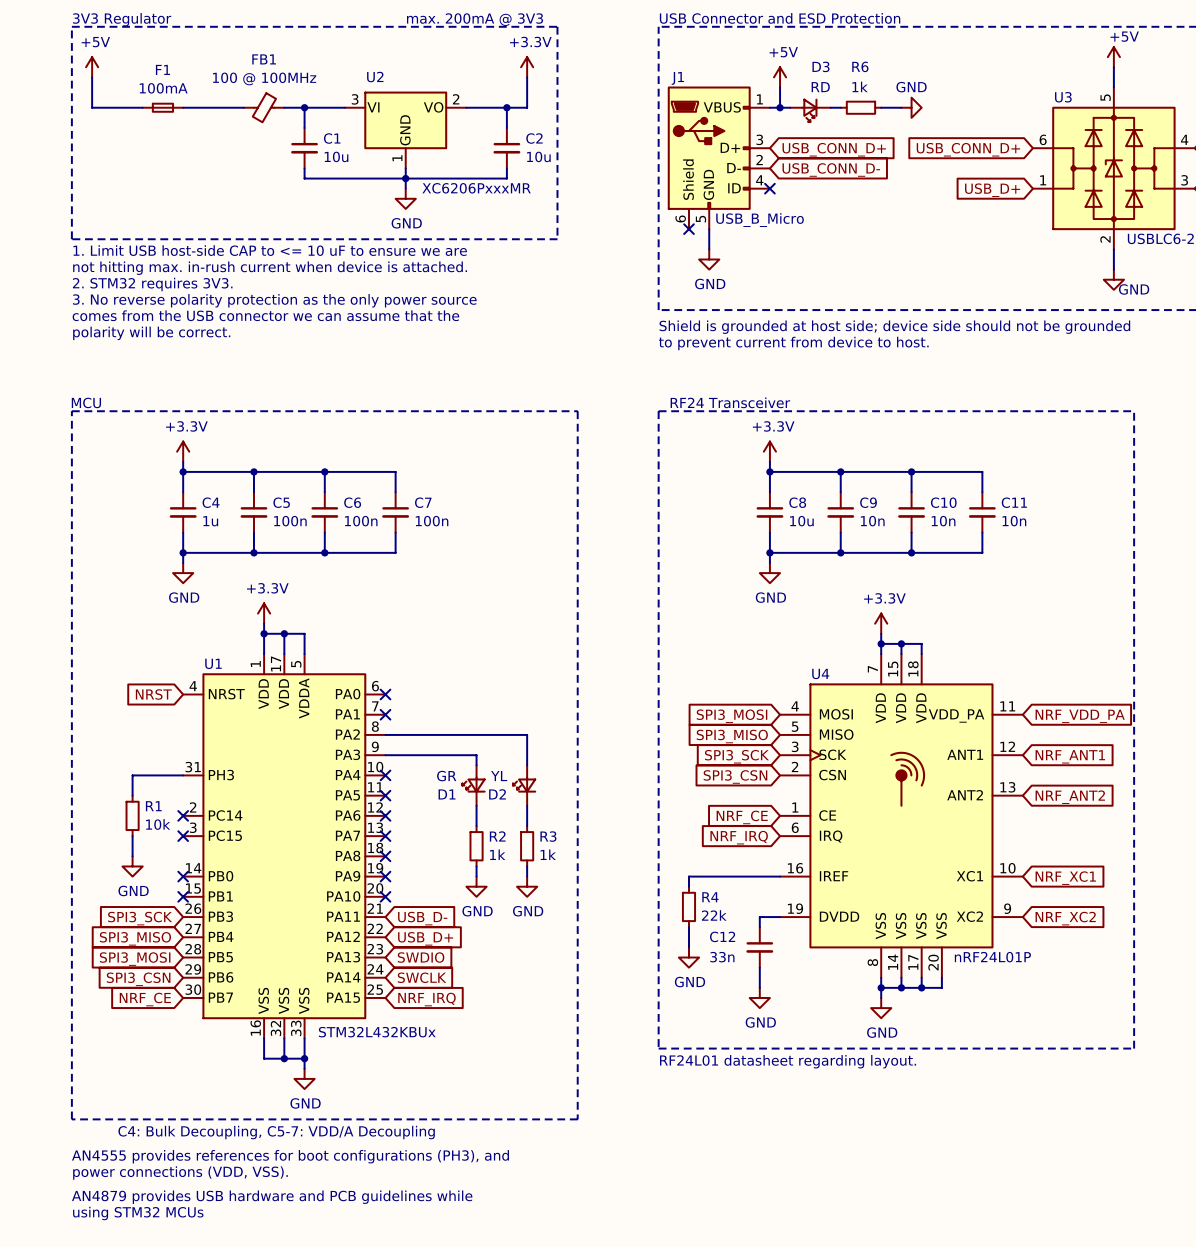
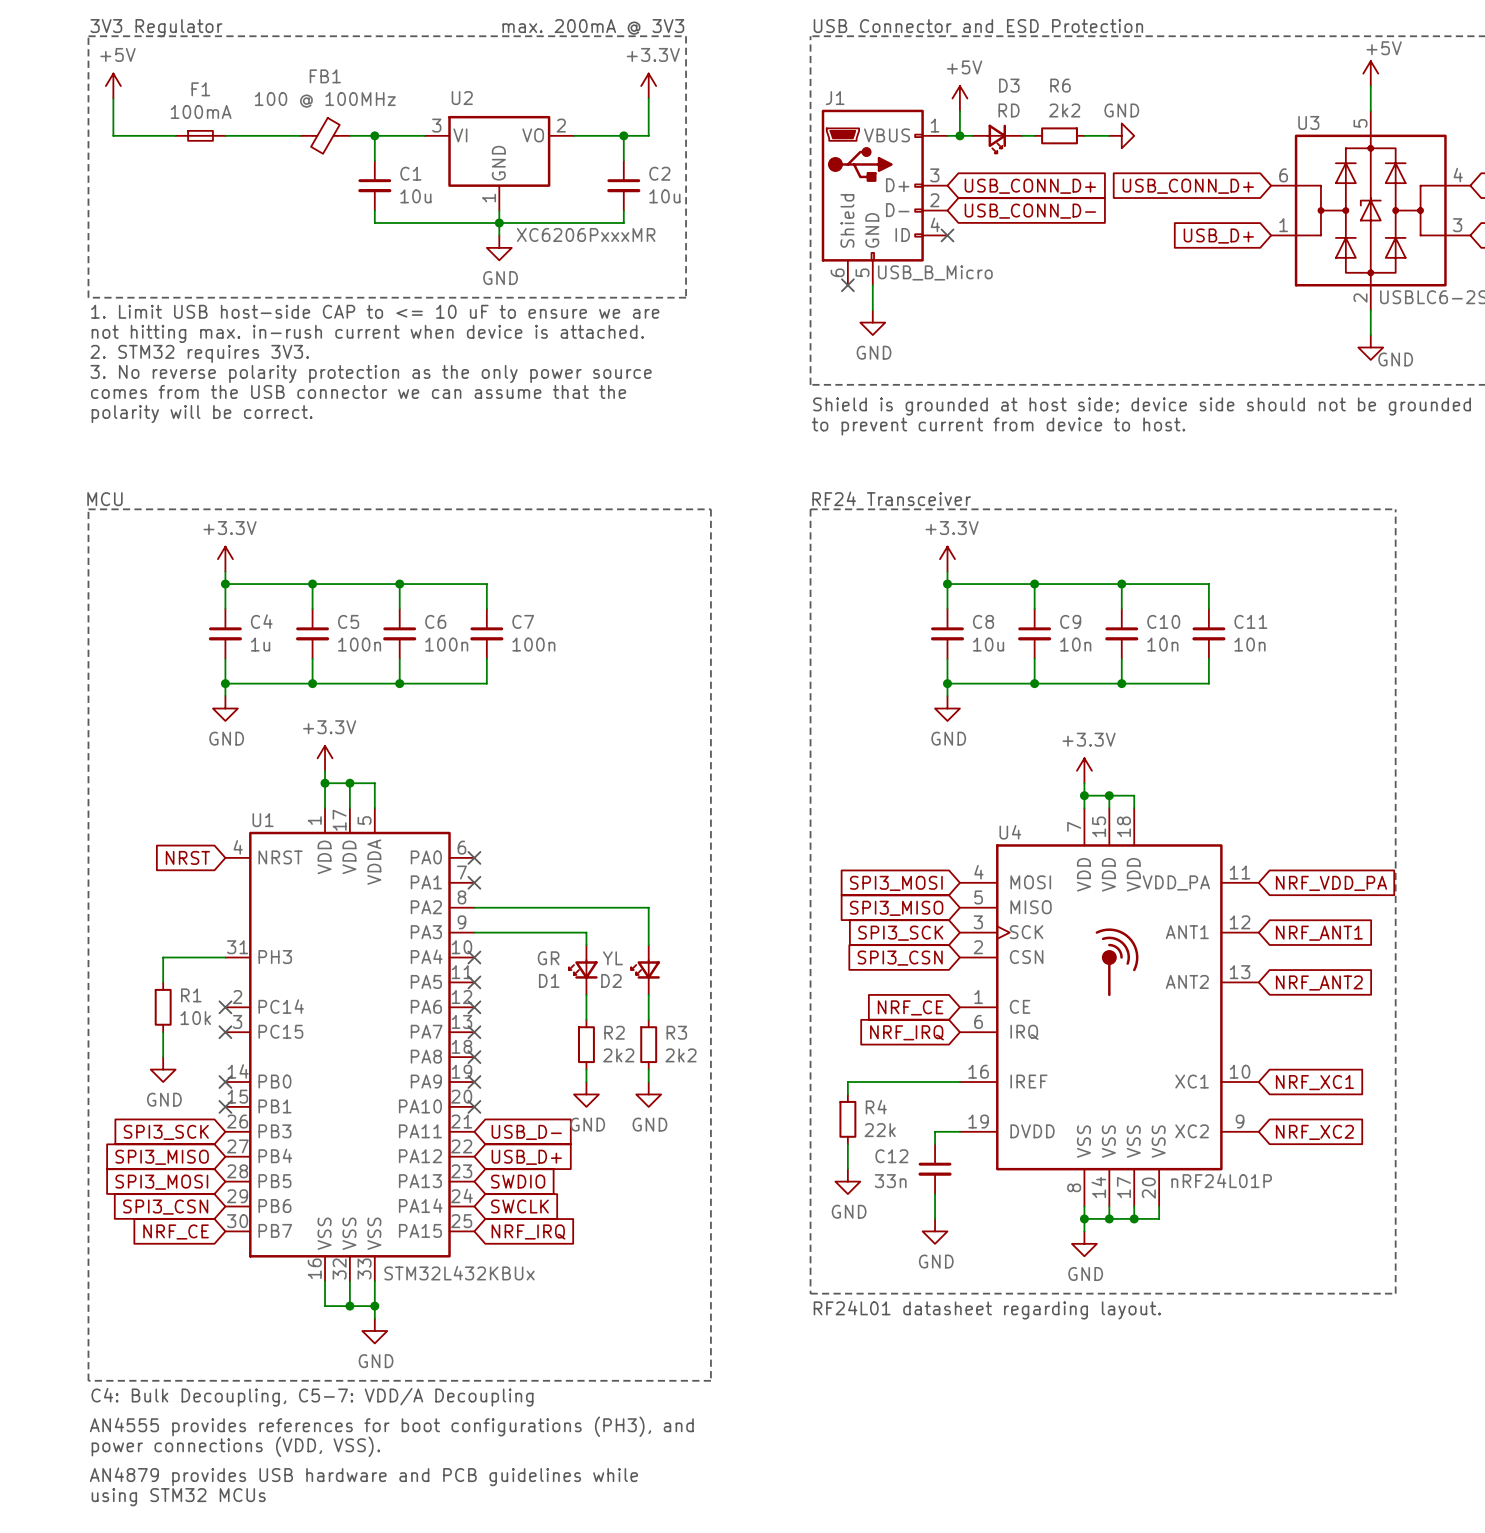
R6 value: 1k (860, 86) -> 2k2 (1064, 110)
R2 value: 1k (497, 854) -> 2k2 (618, 1055)
R3 value: 1k (548, 854) -> 2k2 (680, 1055)

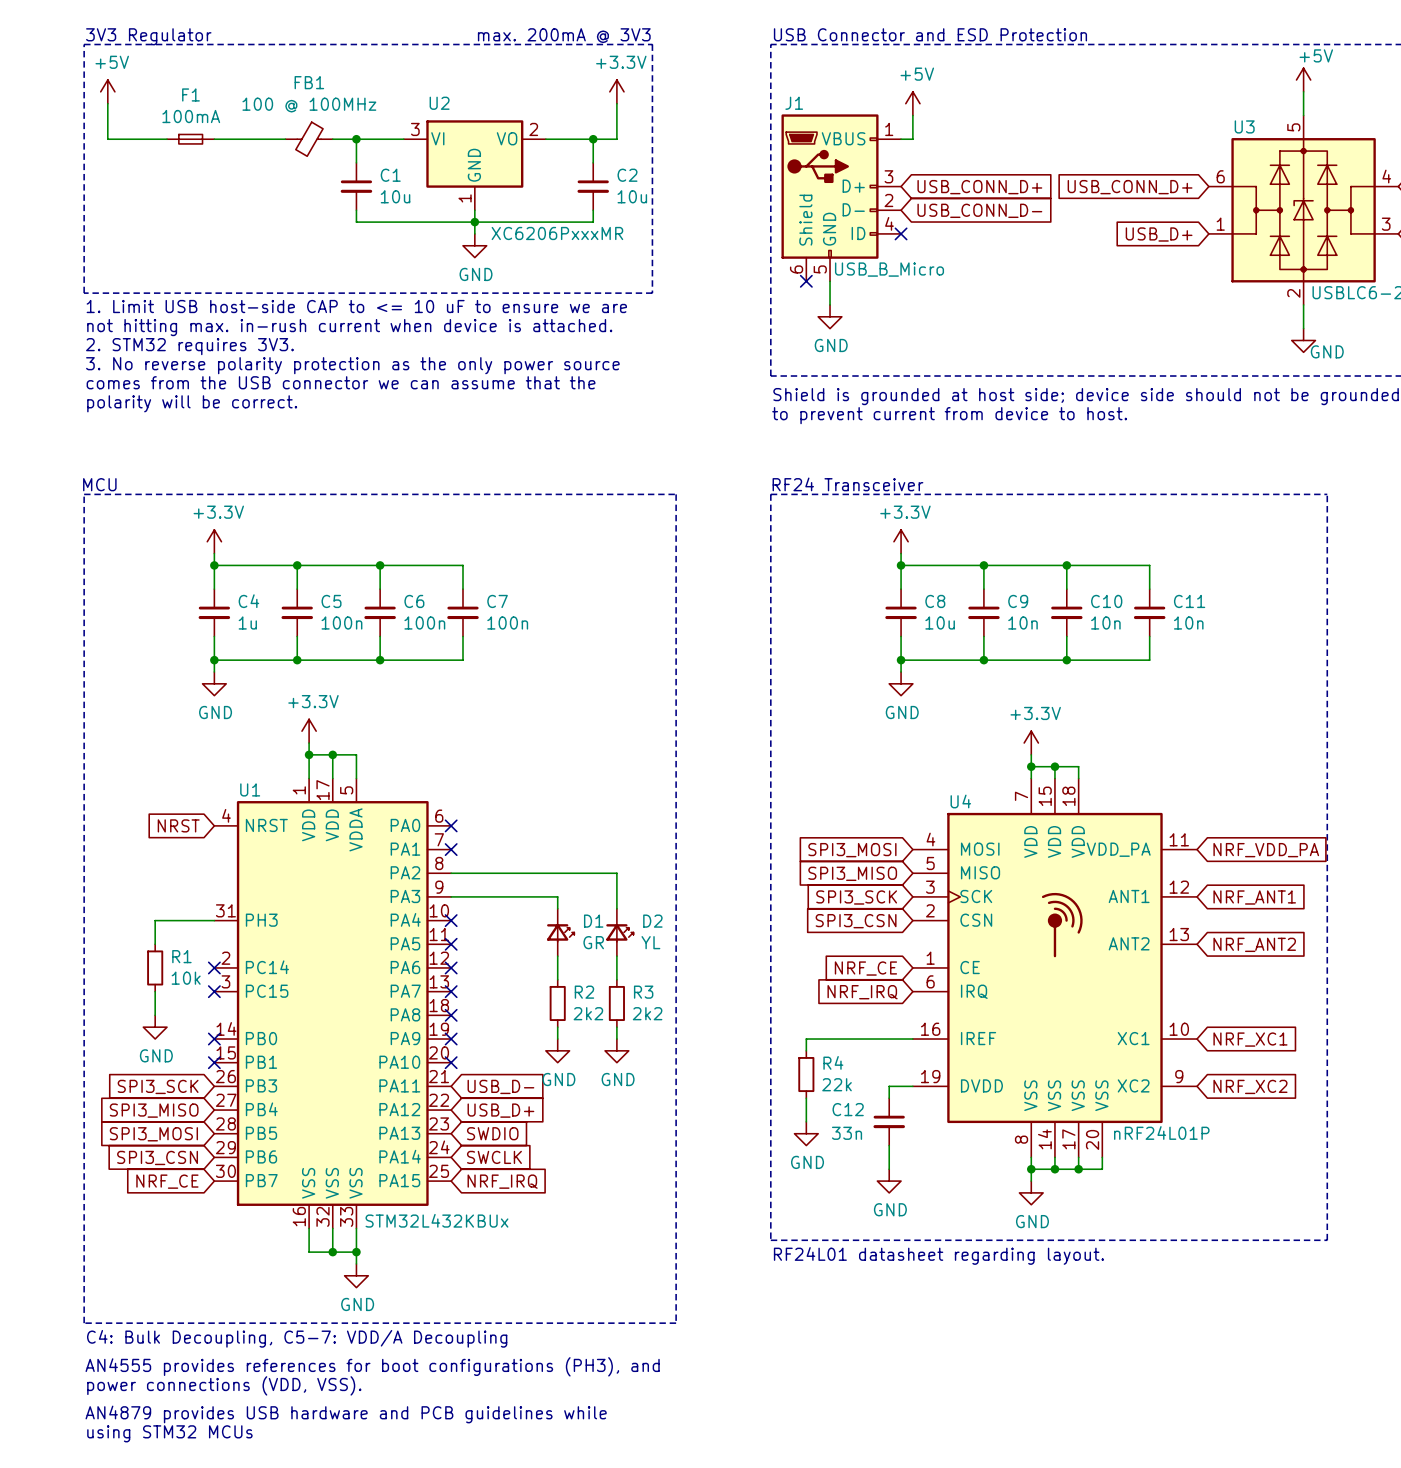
wire: (959, 135) (972, 135) -> none
junction: (959, 135) -> none
wire: (1022, 135) (1034, 135) -> none
R6: 2k2 (1059, 135) -> none
wire: (1084, 135) (1109, 135) -> none
power symbol: GND (1121, 135) -> none
D3: RD (997, 138) -> none
D1 rotation: 0° (583, 969) -> 180° (560, 933)
D2 rotation: 0° (645, 969) -> 180° (619, 933)

